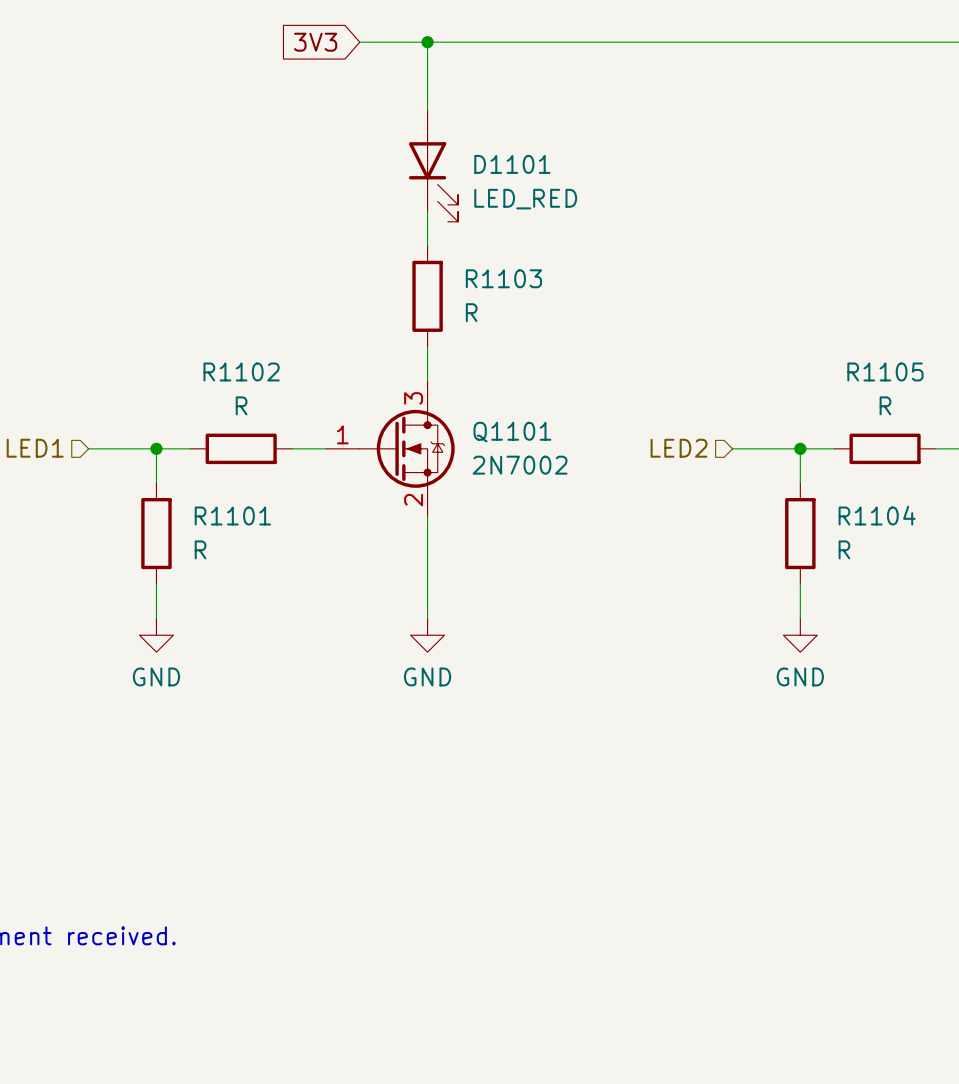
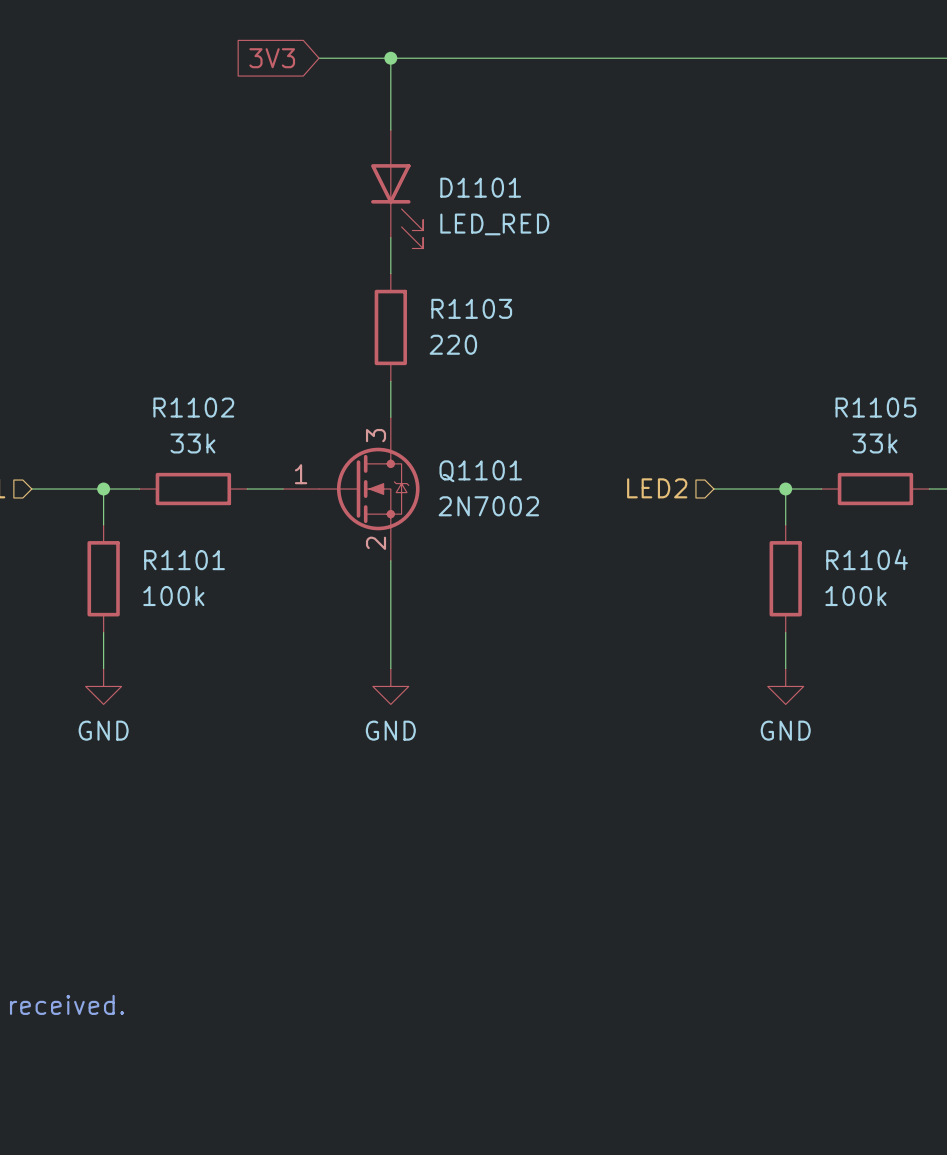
R1103 value: R (471, 312) -> 220 (453, 344)
R1102 value: R (241, 405) -> 33k (192, 443)
R1105 value: R (885, 405) -> 33k (875, 443)
R1101 value: R (200, 549) -> 100k (173, 596)
R1104 value: R (844, 549) -> 100k (855, 596)

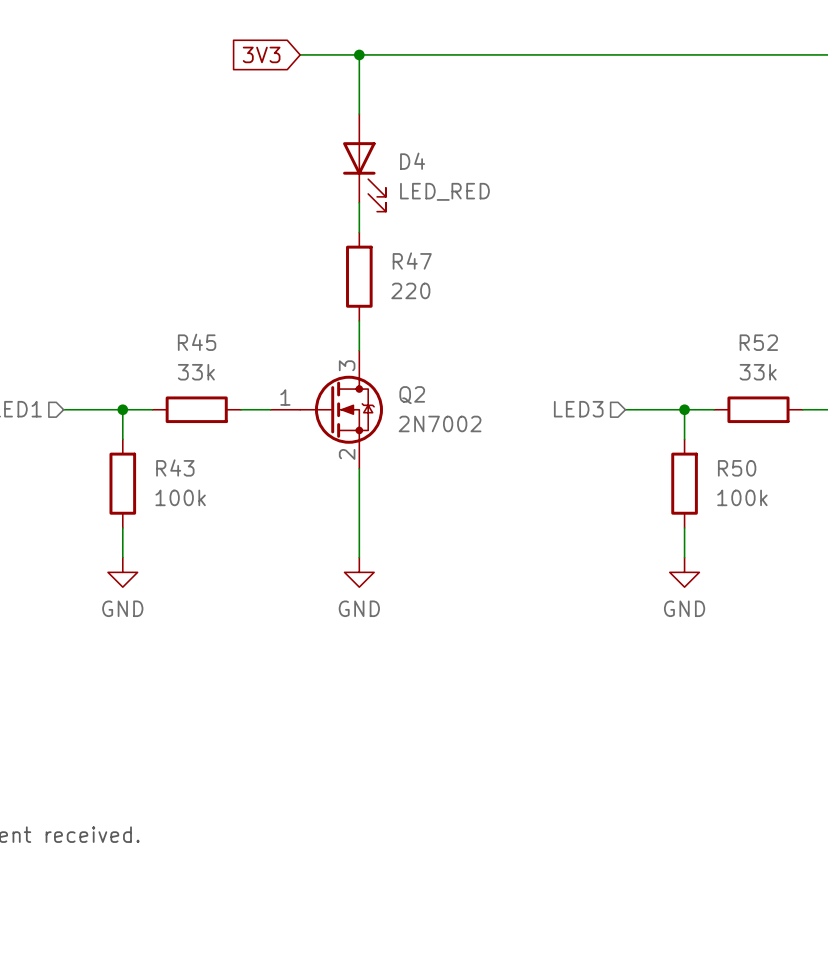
D1101 name: D1101 (480, 187) -> D4 (412, 161)
R1103 name: R1103 (471, 308) -> R47 (412, 261)
R1102 name: R1102 (193, 407) -> R45 (197, 342)
R1105 name: R1105 (875, 407) -> R52 (758, 342)
Q1101 name: Q1101 (480, 471) -> Q2 (412, 395)
hierarchical label: LED2 (657, 488) -> LED3 (578, 409)
R1104 name: R1104 (867, 559) -> R50 (737, 468)
R1101 name: R1101 (184, 560) -> R43 (175, 467)

